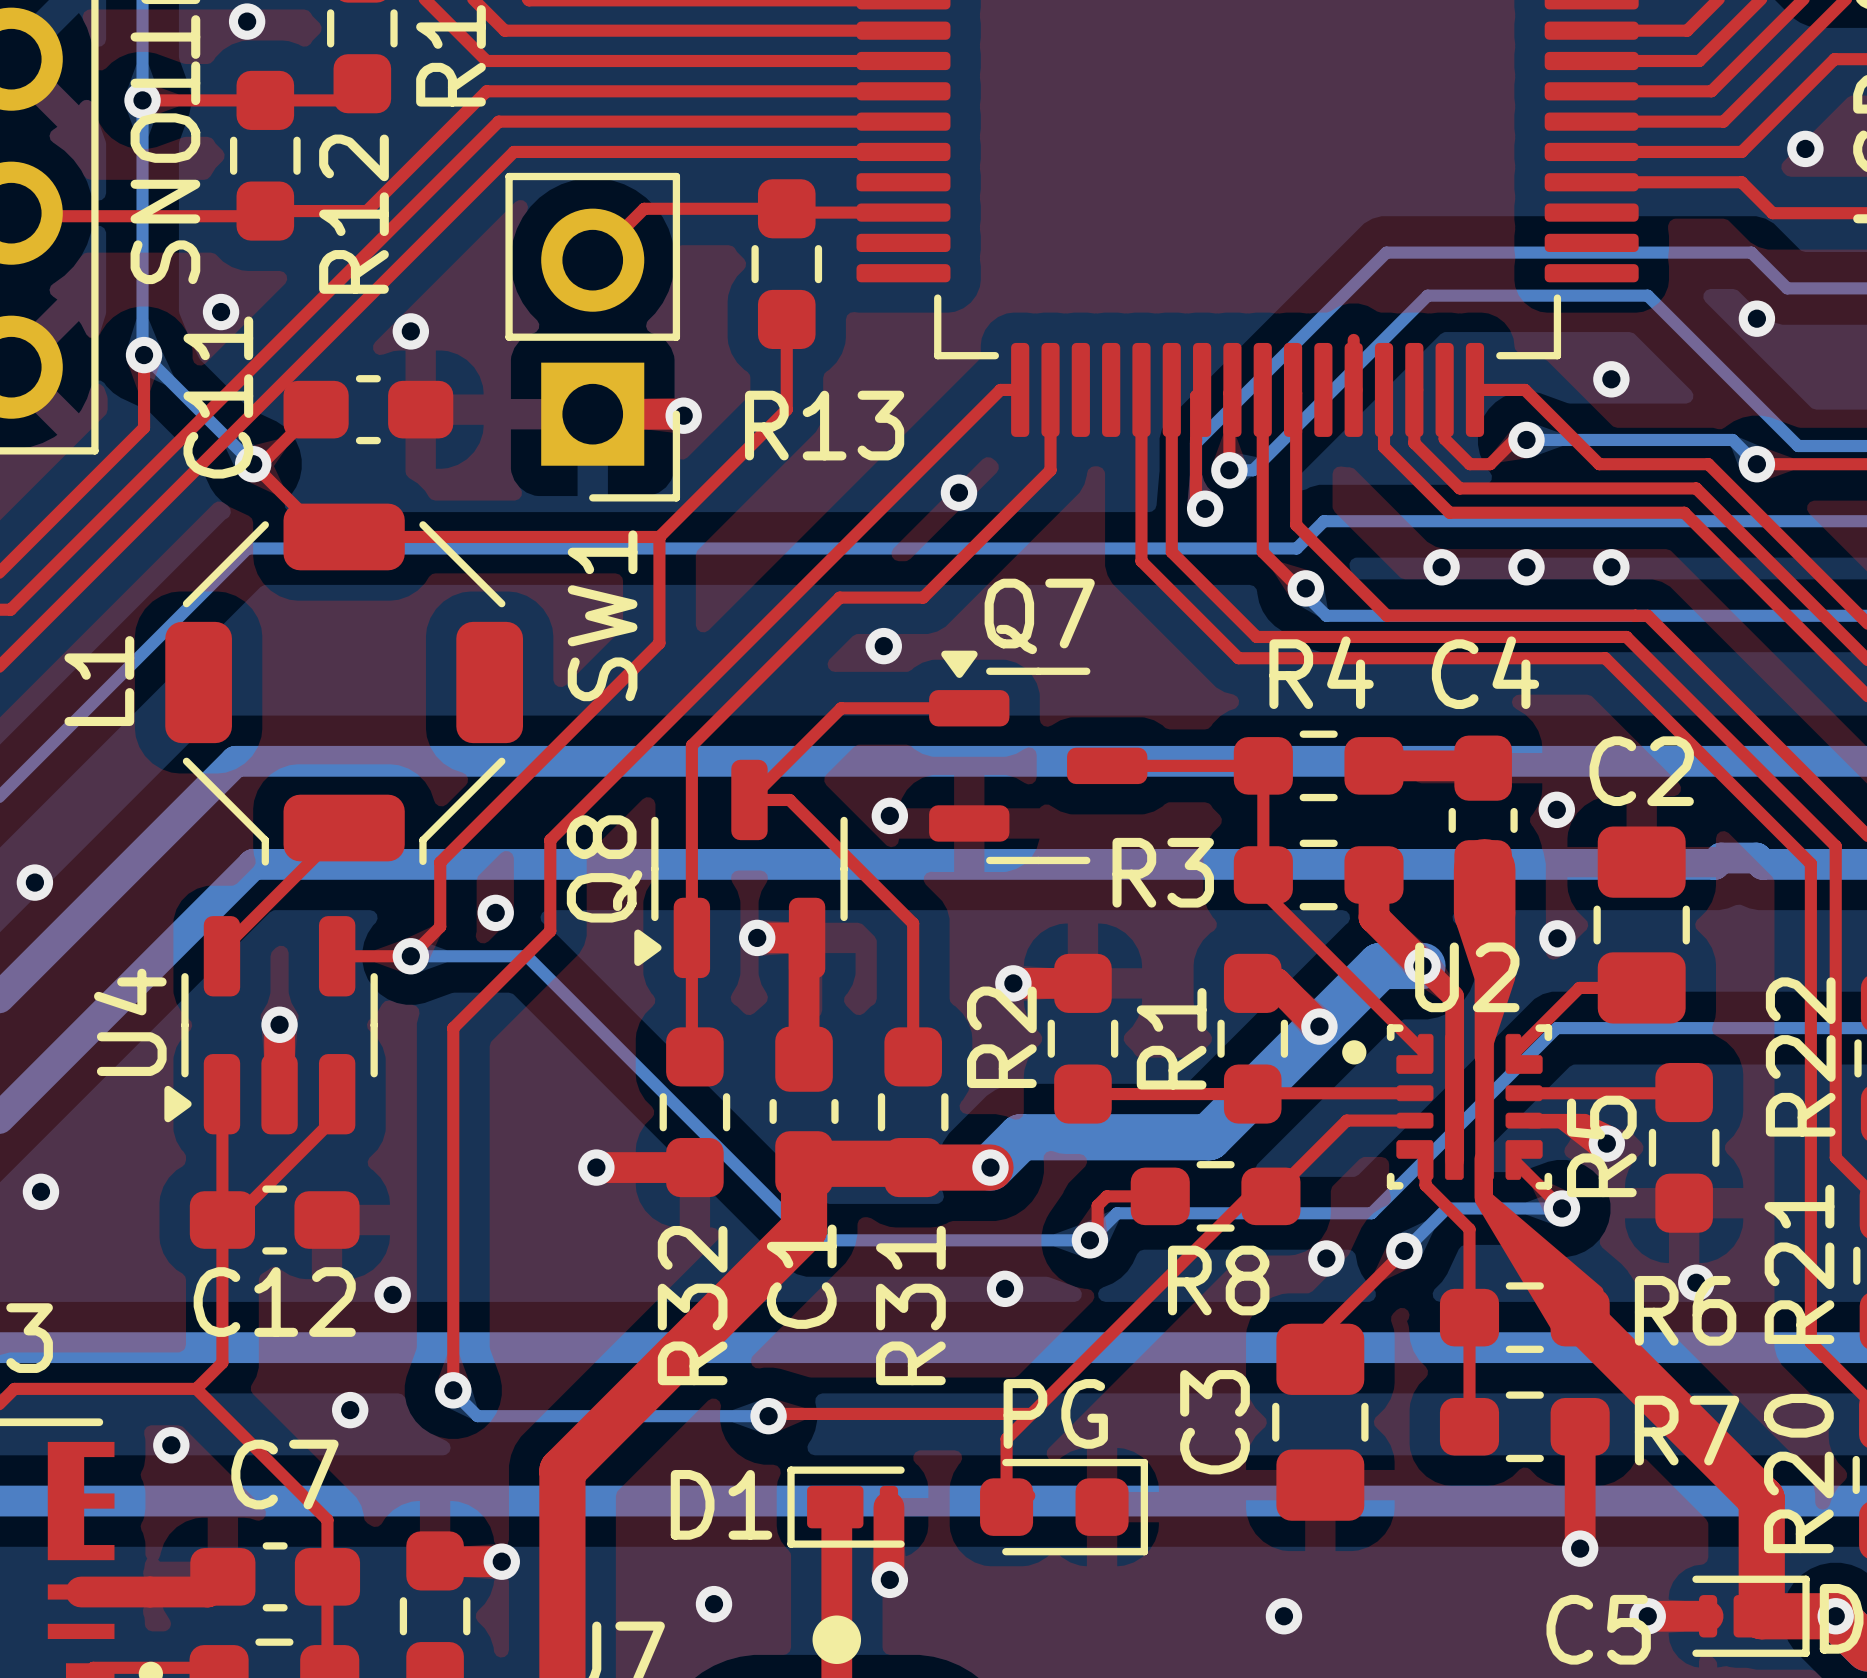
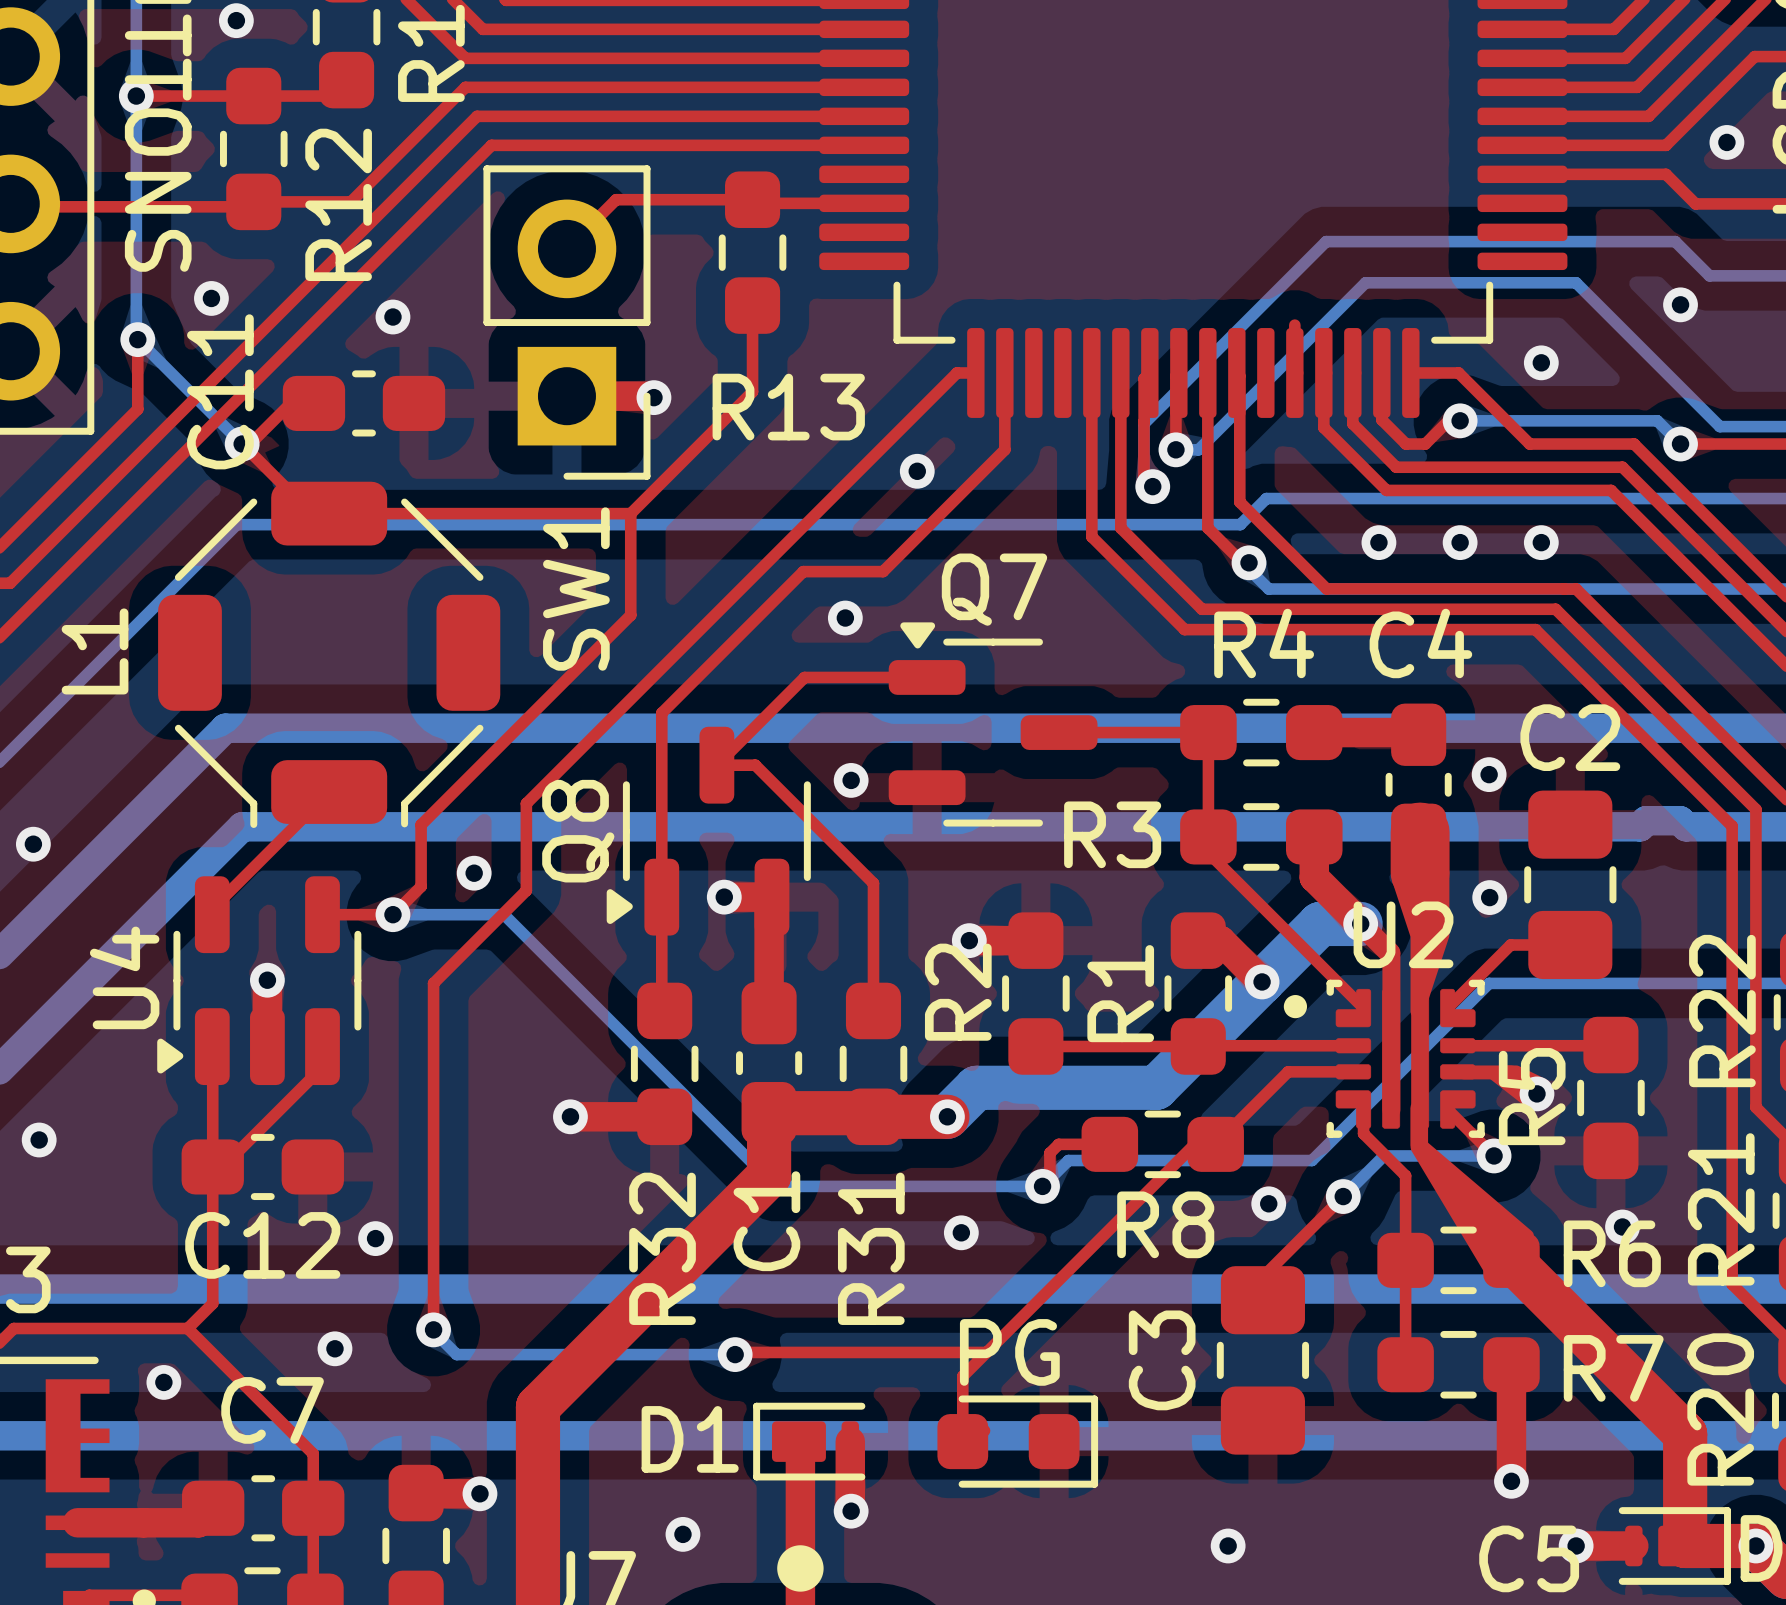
C11 position: (368, 409) -> (363, 403)

